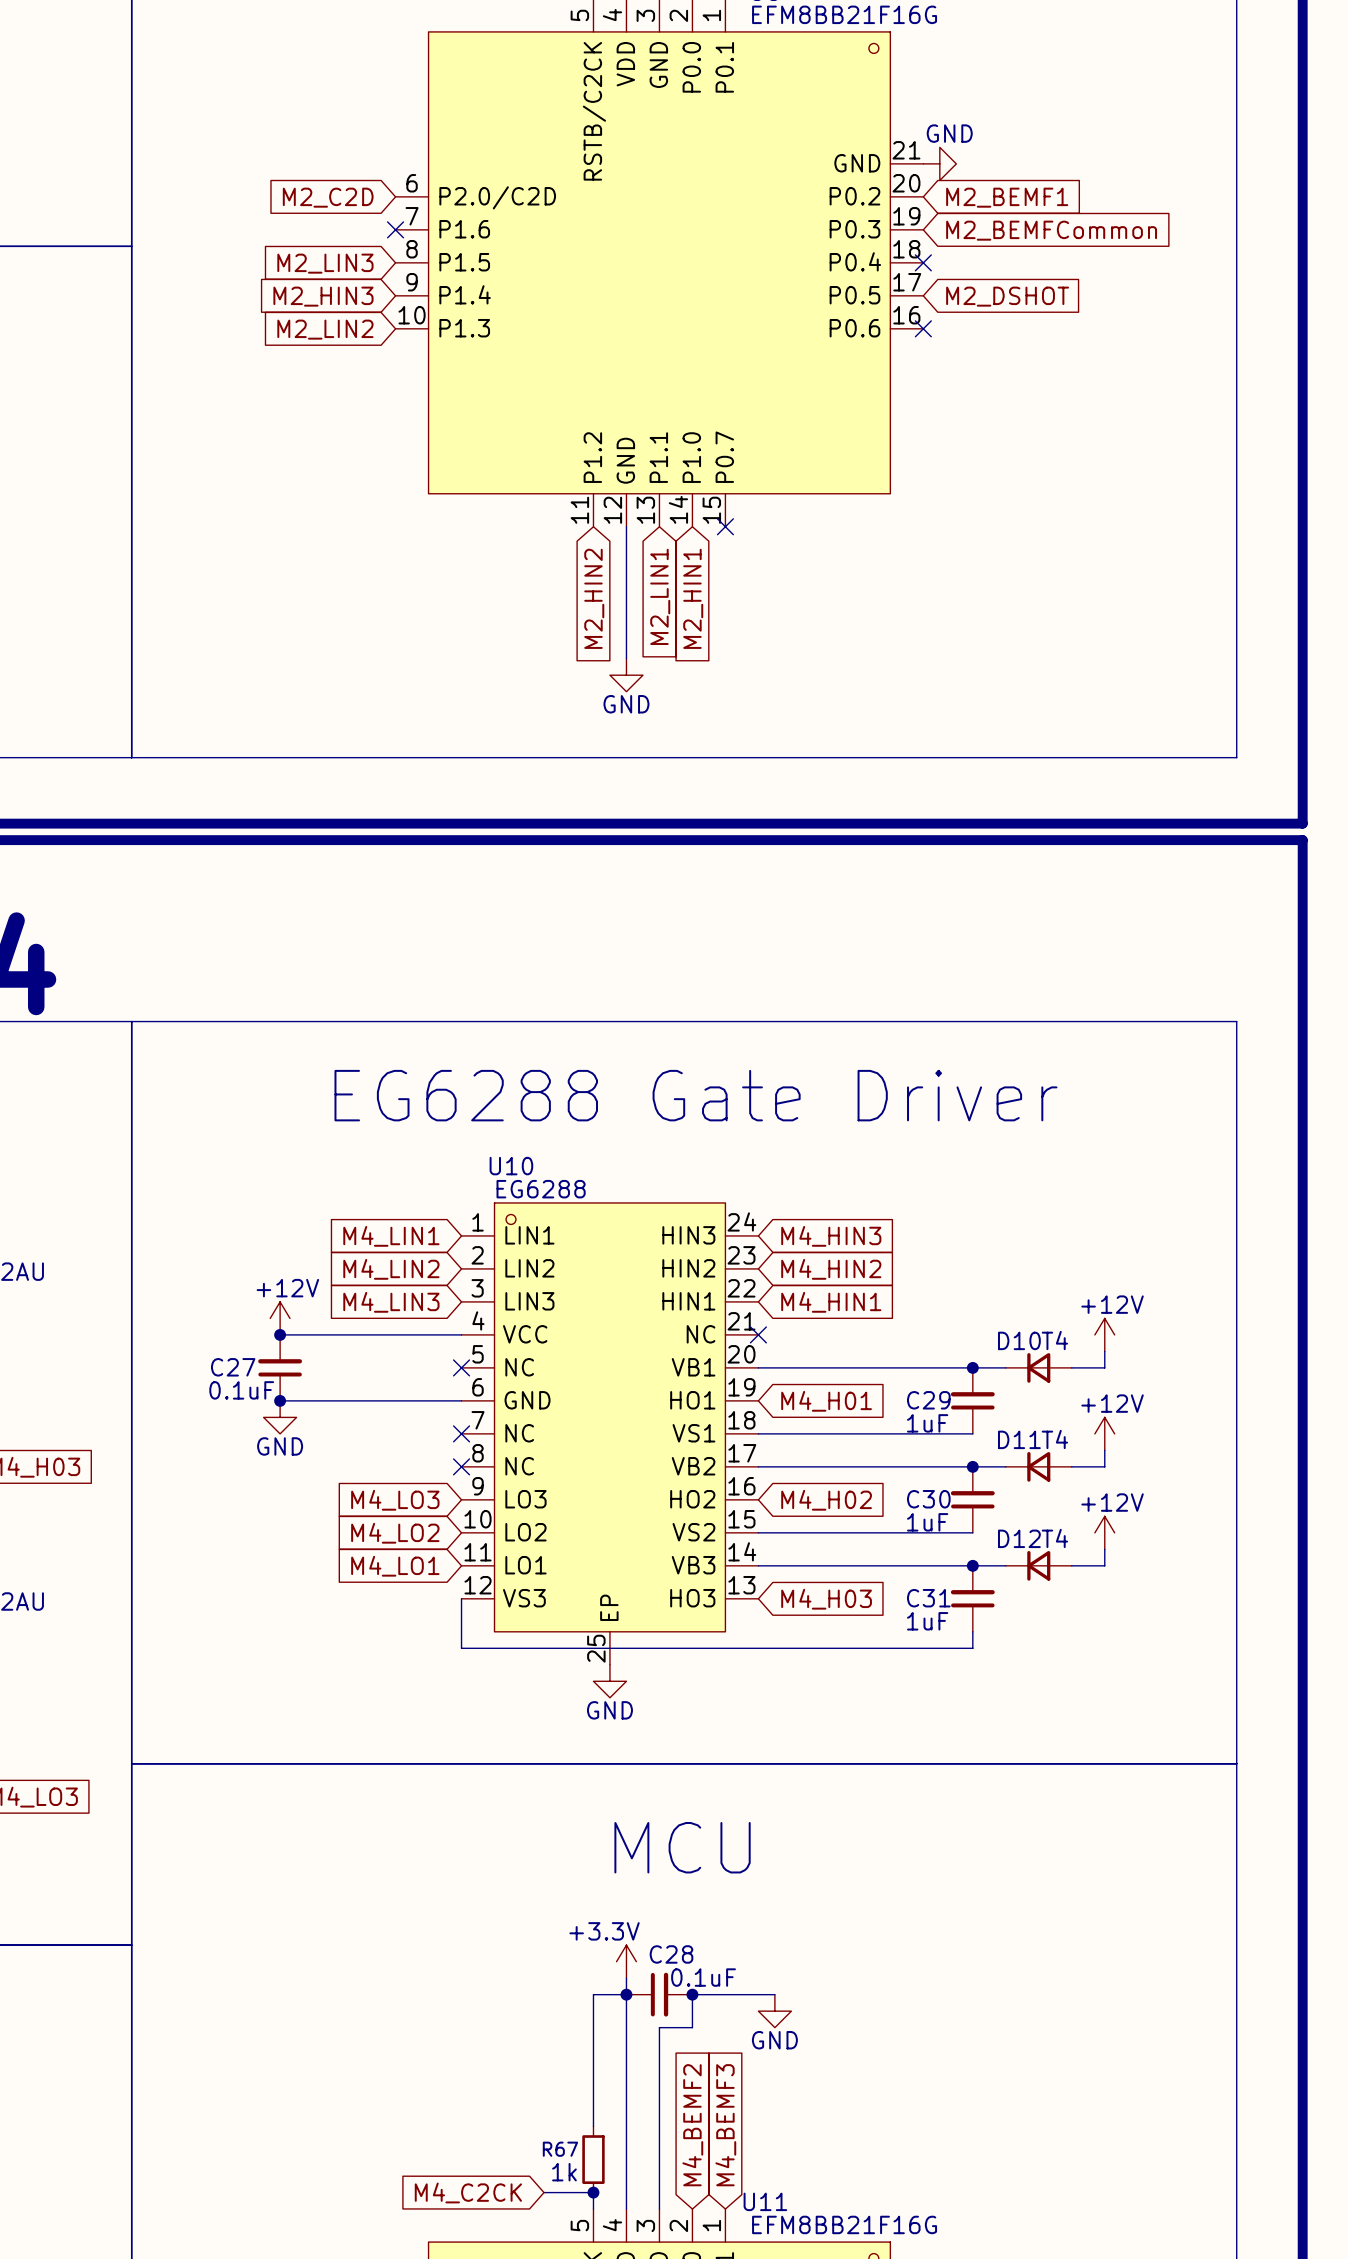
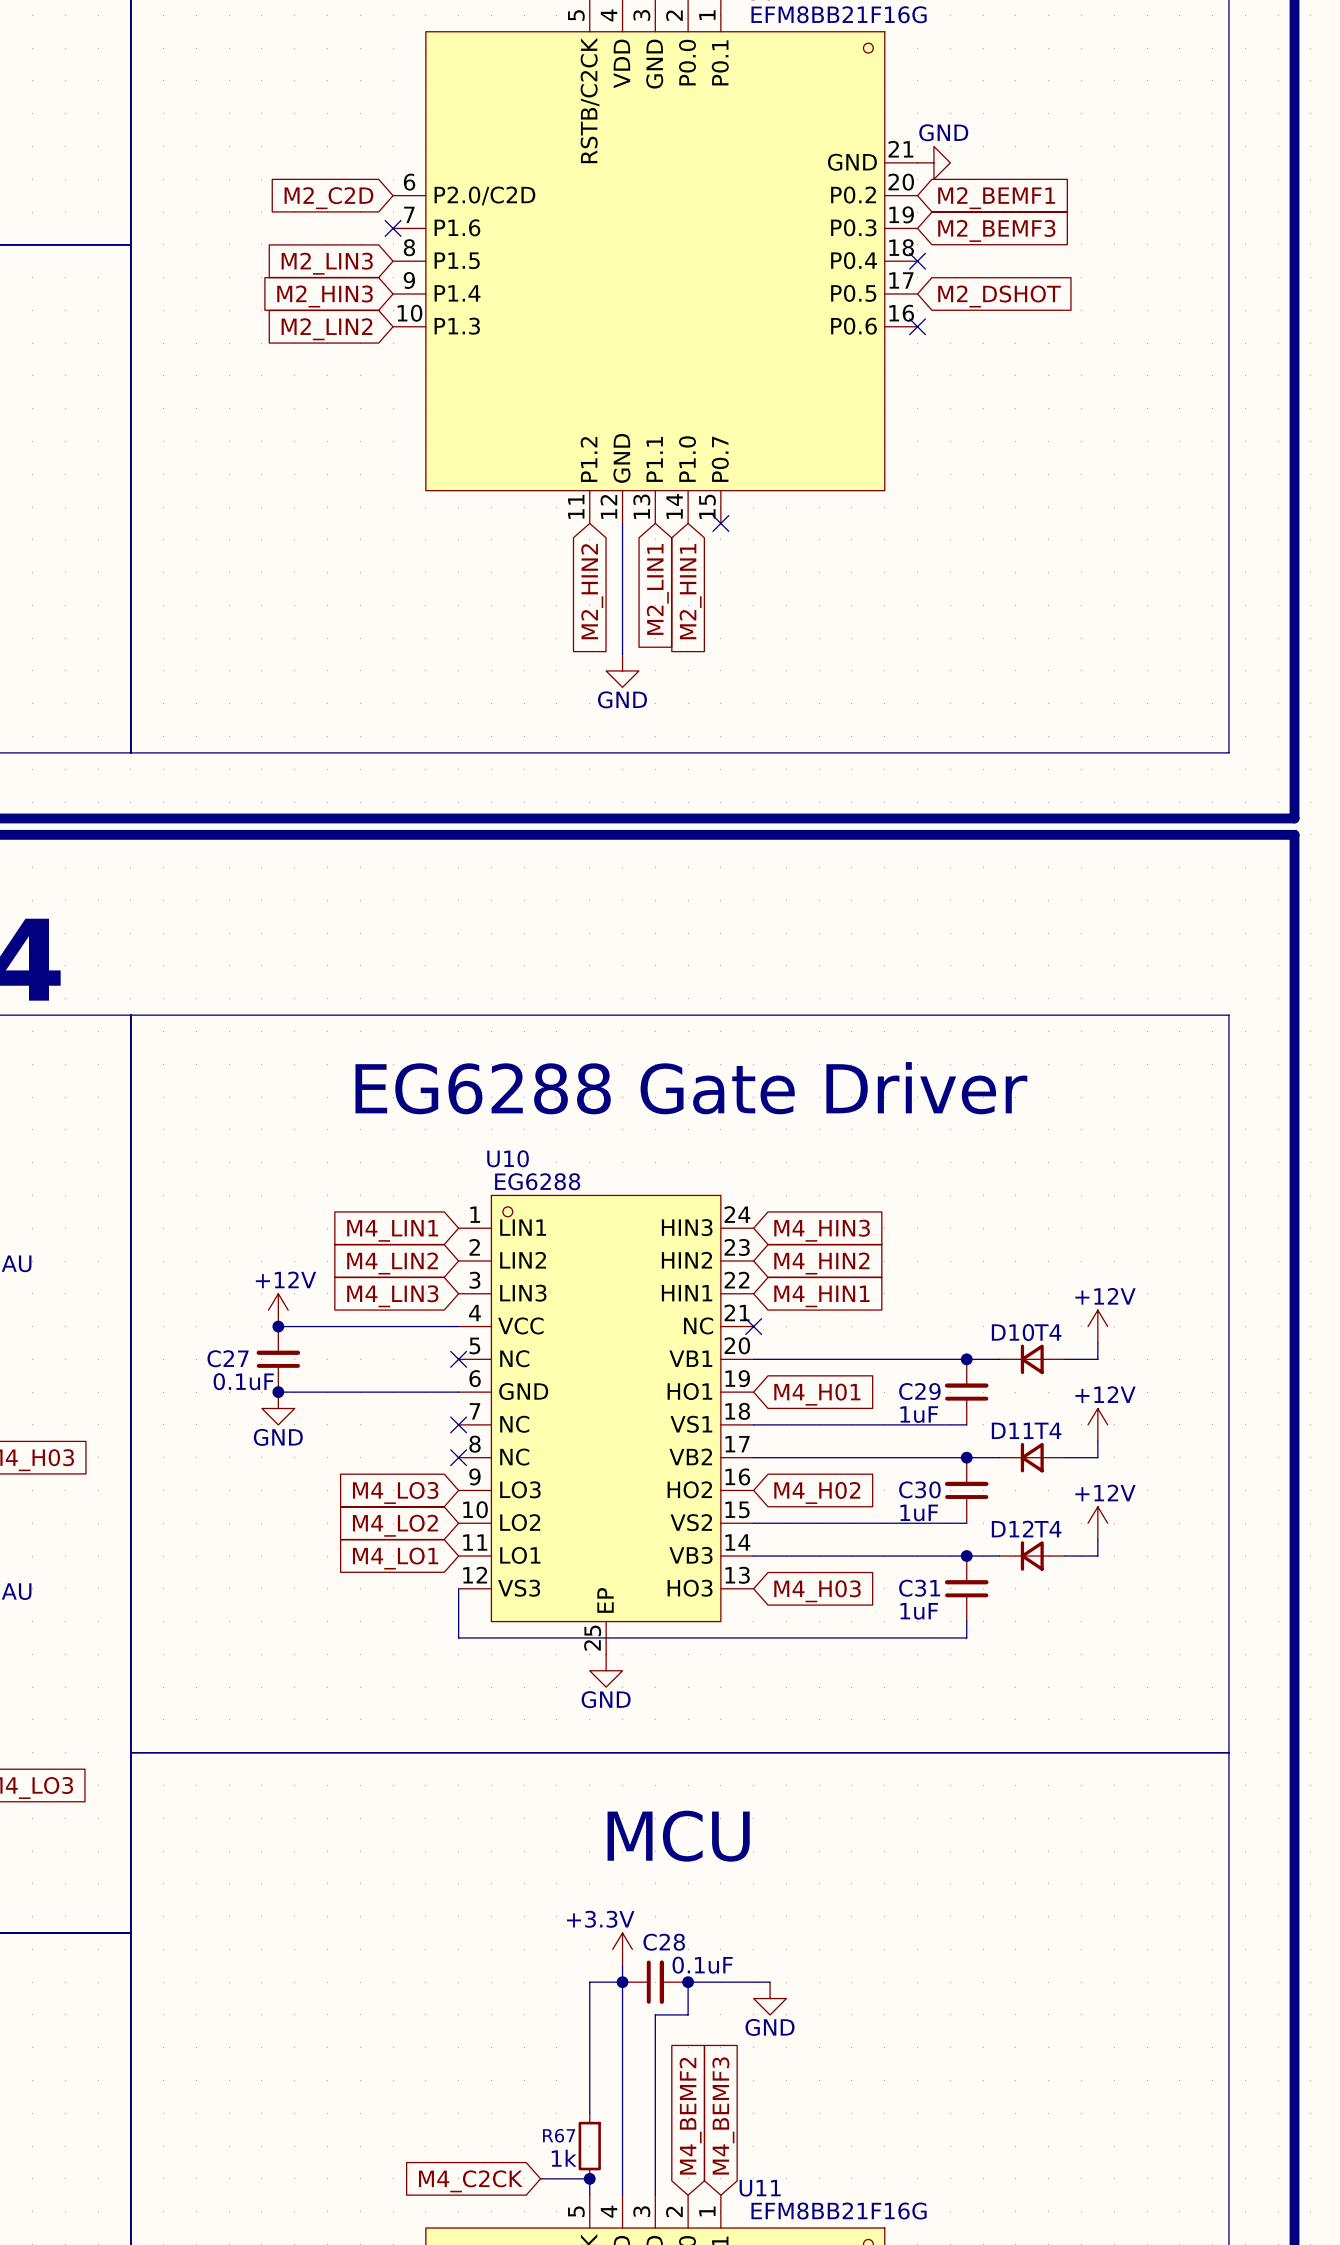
global label: M2_BEMFCommon (1051, 230) -> M2_BEMF3 (996, 230)

